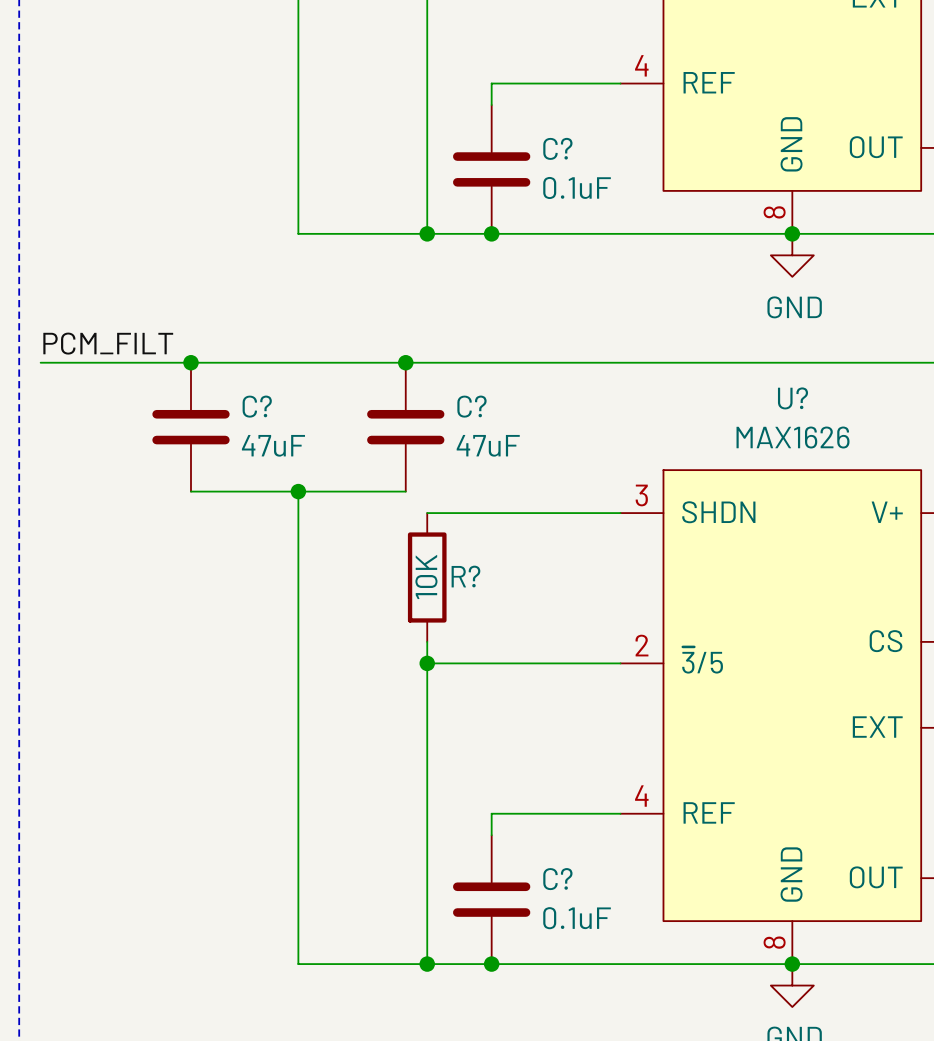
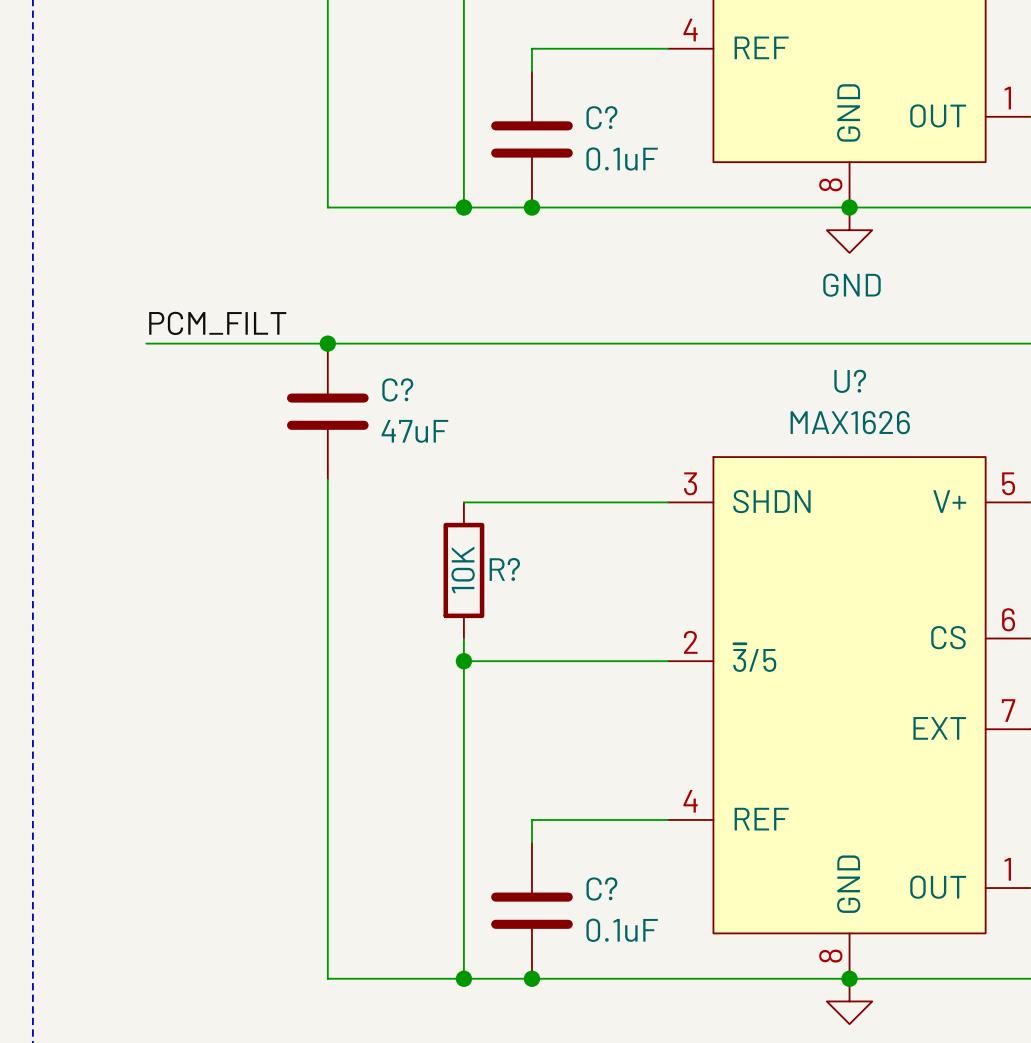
label position: PCM_FILT (108, 343) -> PCM_FILT (217, 323)
wire: (40, 362) (126, 362) -> none
junction: (190, 362) -> none
junction: none -> (327, 343)
junction: (405, 362) -> none
C?: 47uF (190, 427) -> none
C?: none -> 47uF (327, 411)
C?: 47uF (405, 427) -> none
wire: (190, 491) (405, 491) -> none
junction: (298, 491) -> none

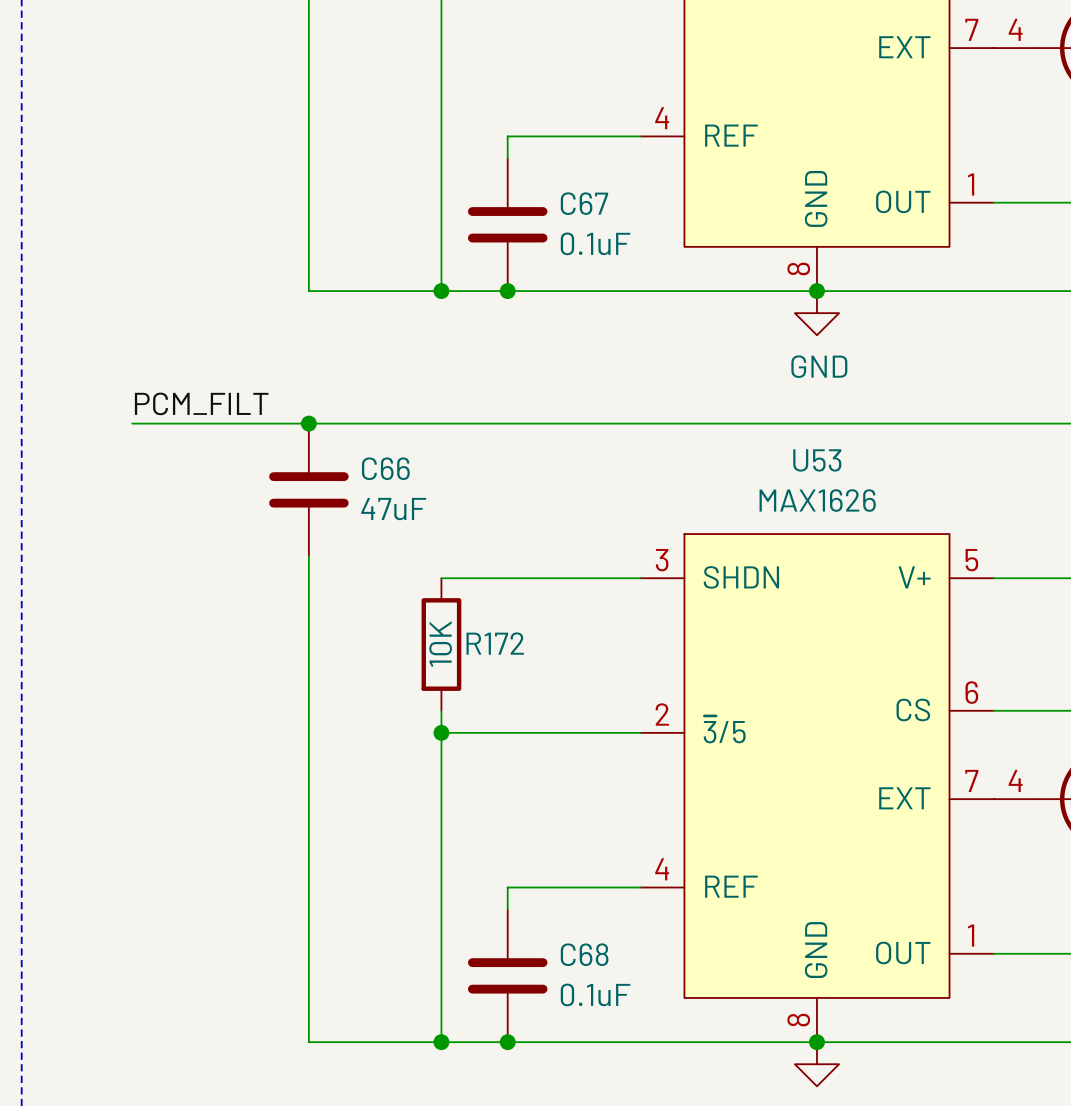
C? name: C? (601, 117) -> C67 (584, 203)
U? name: U? (850, 381) -> U53 (817, 460)
C? name: C? (397, 389) -> C66 (385, 468)
R? name: R? (504, 569) -> R172 (495, 643)
C? name: C? (601, 888) -> C68 (584, 954)

